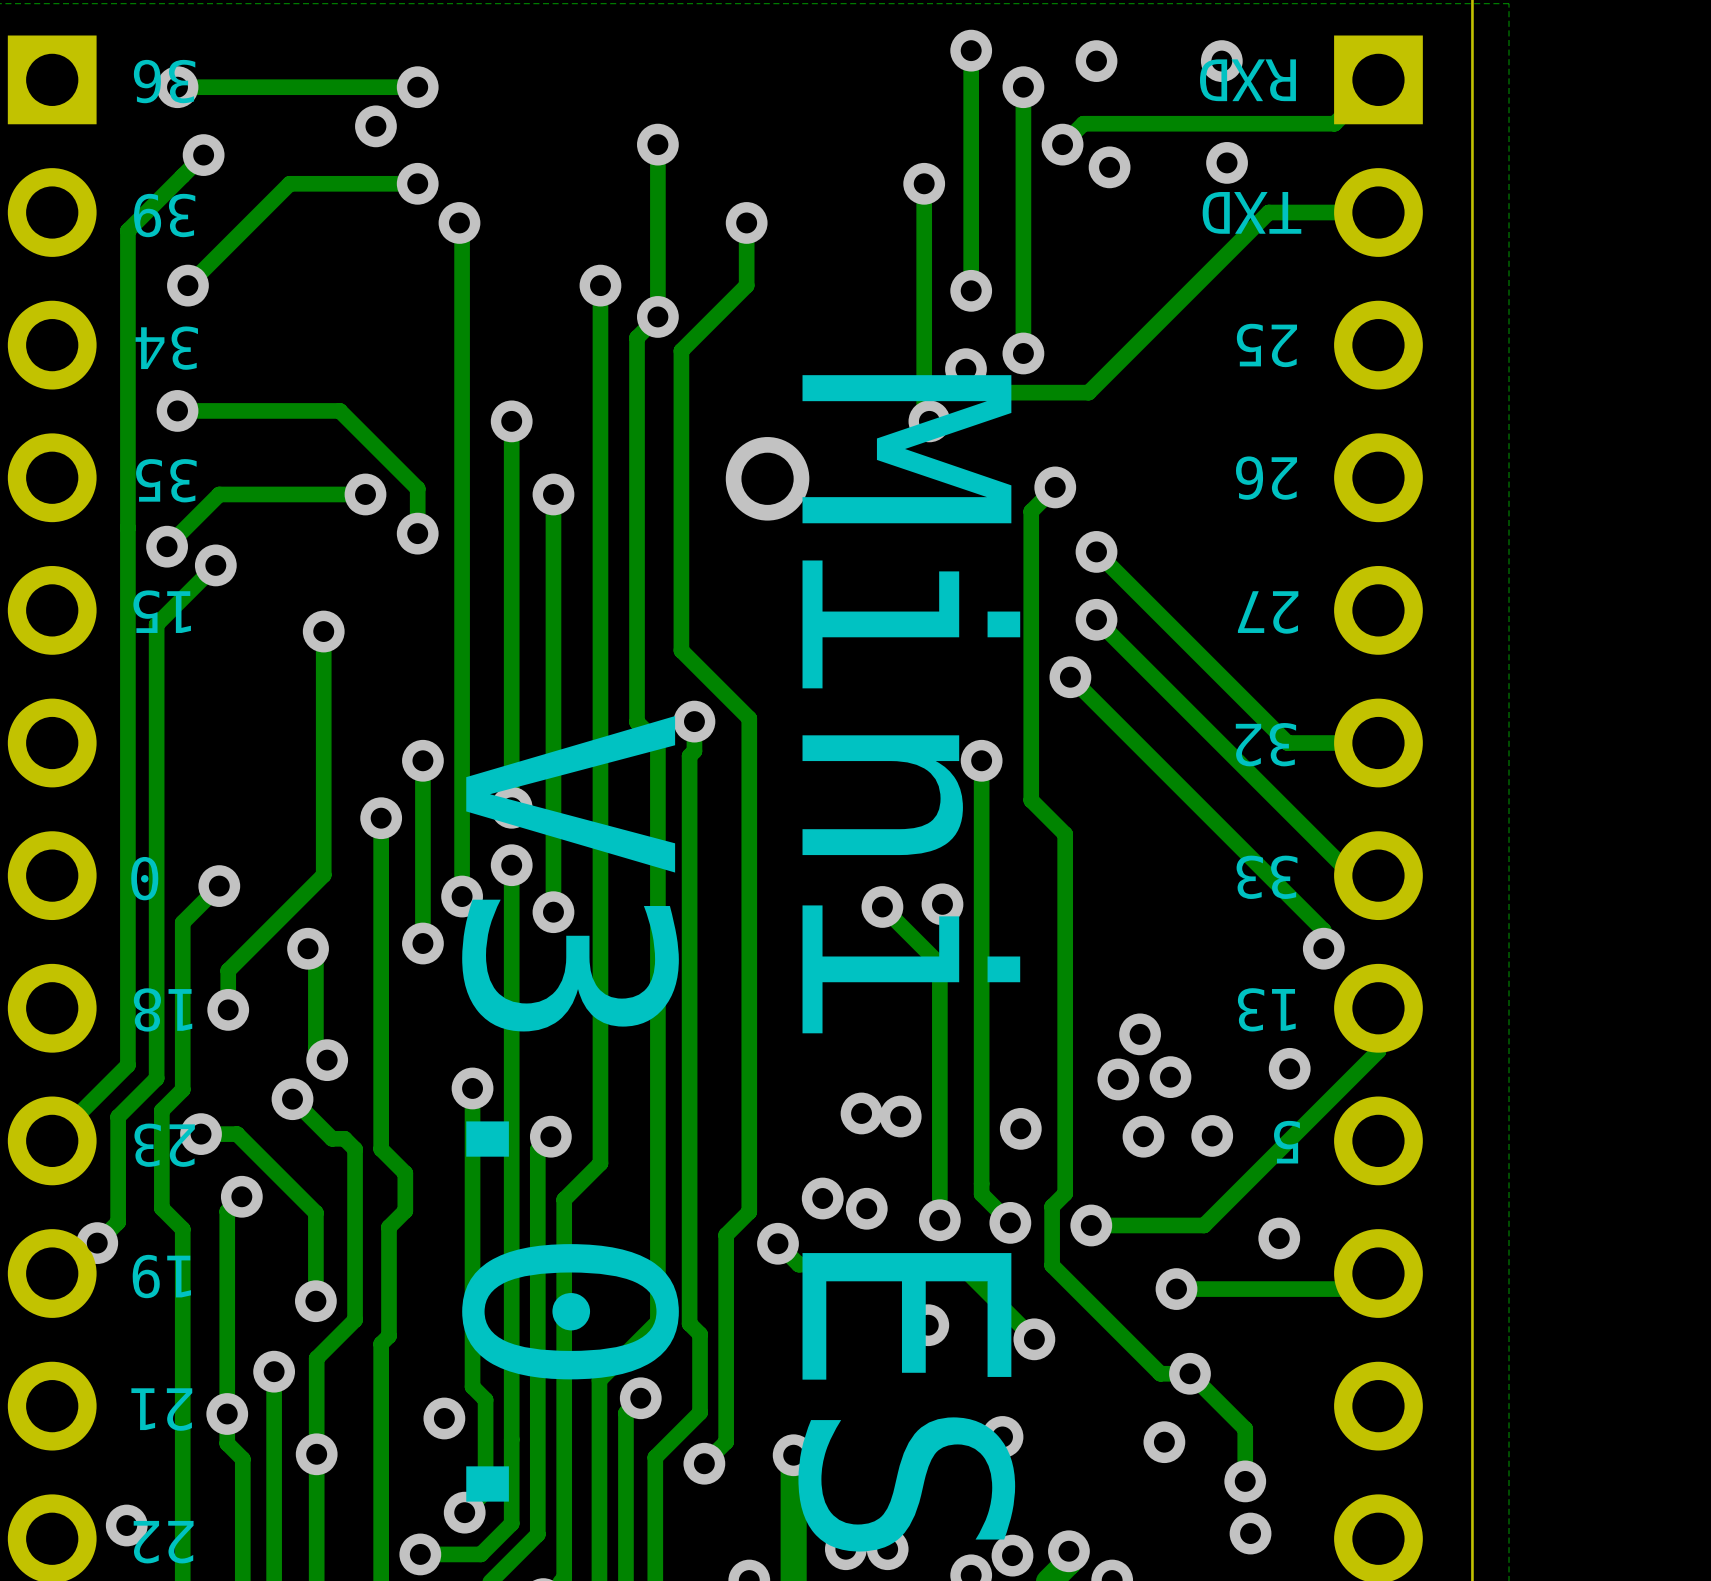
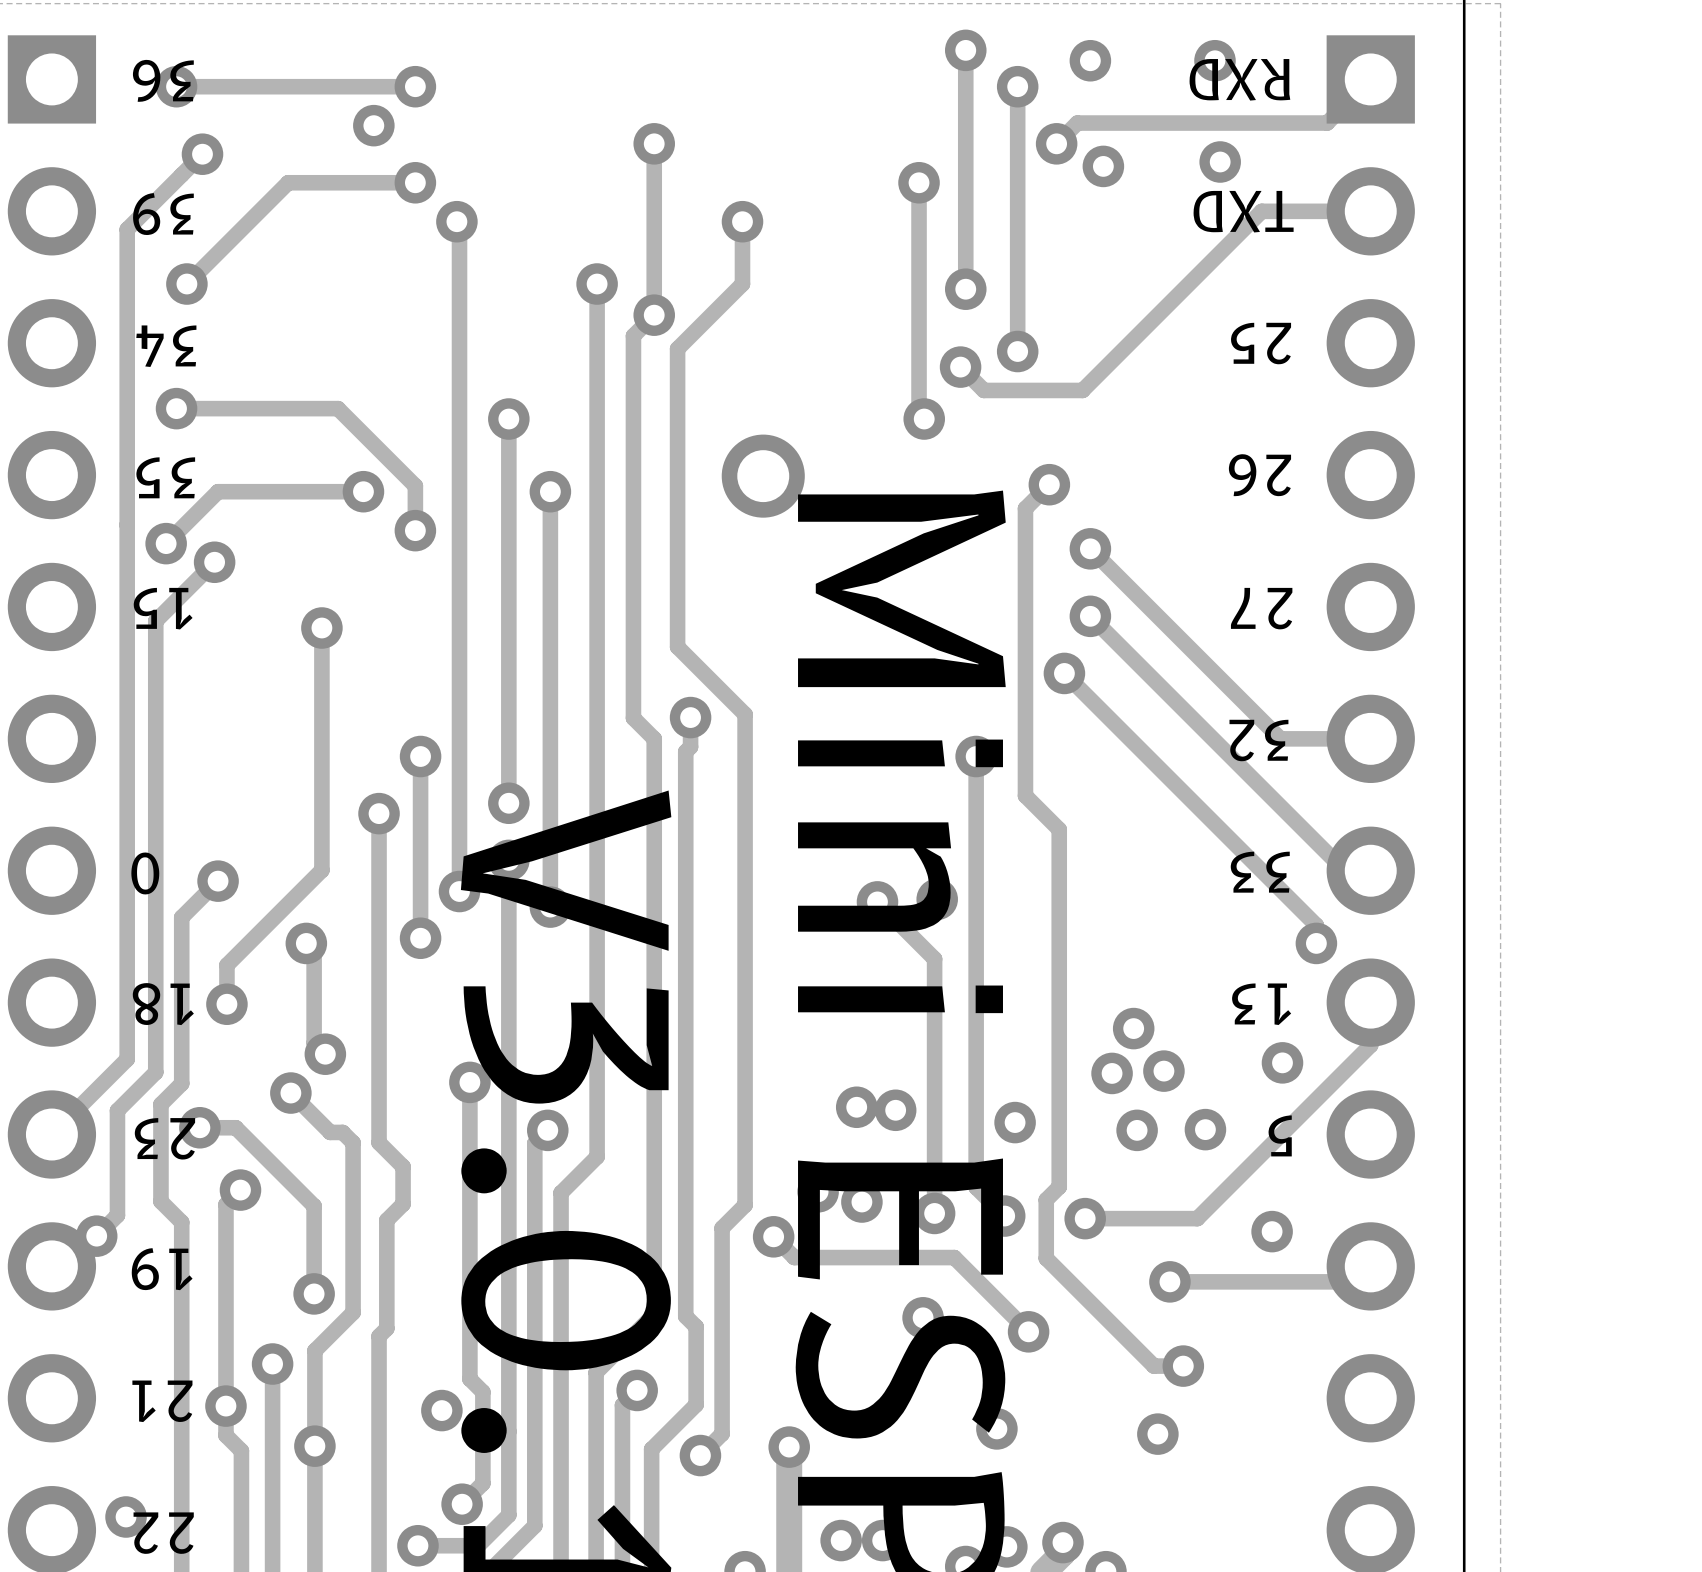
track: (1189, 1373) (1245, 1429) (1245, 1481) -> none
via: (1245, 1481) -> none
via: (1250, 1533) -> none

